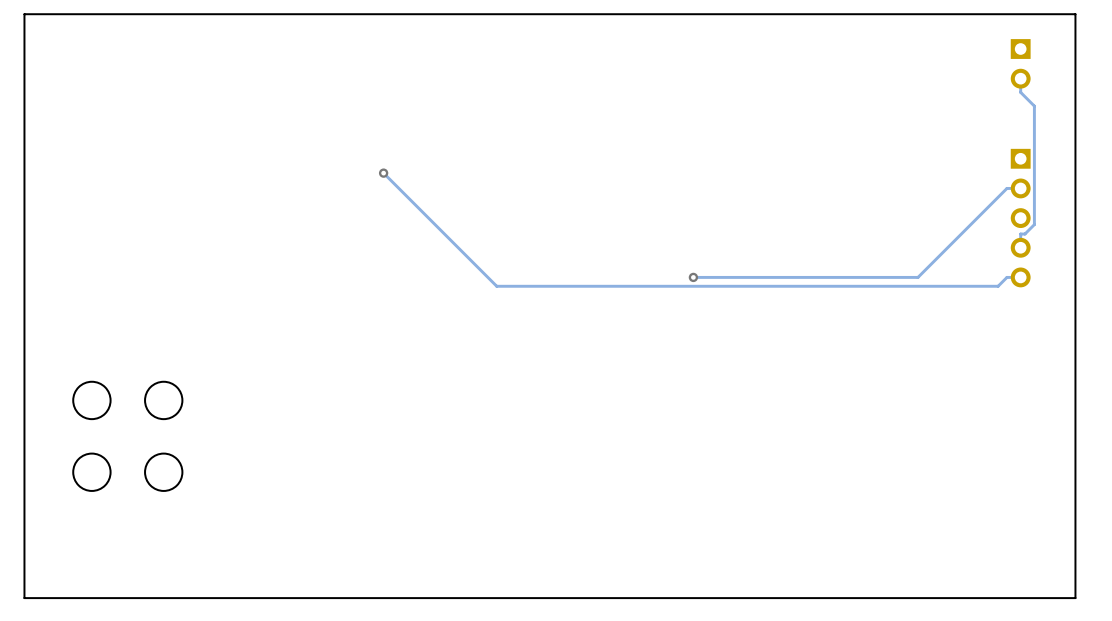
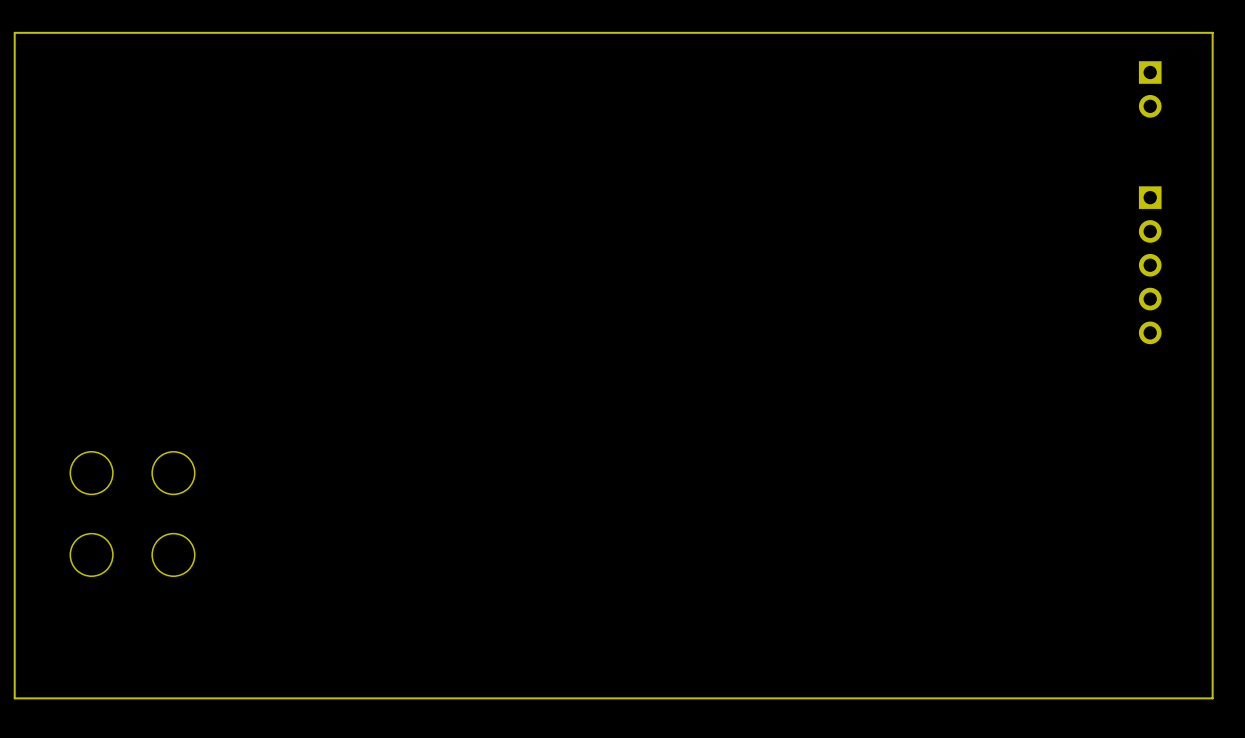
track: (1020, 78) (1020, 92) (1034, 106) (1034, 224) (1024, 234) (1020, 234) (1020, 247) -> none
track: (383, 173) (496, 286) (998, 286) (1006, 277) (1020, 277) -> none
via: (383, 173) -> none
track: (1020, 188) (1006, 188) (917, 277) (693, 277) -> none
via: (693, 277) -> none

